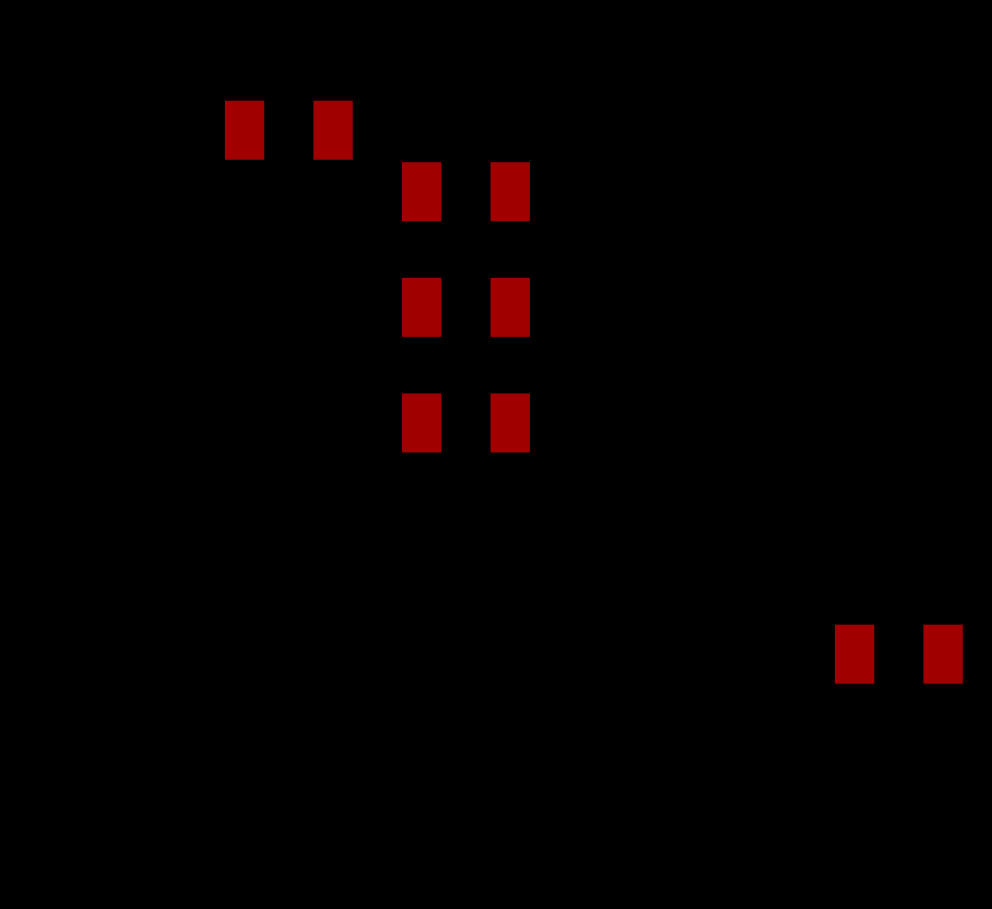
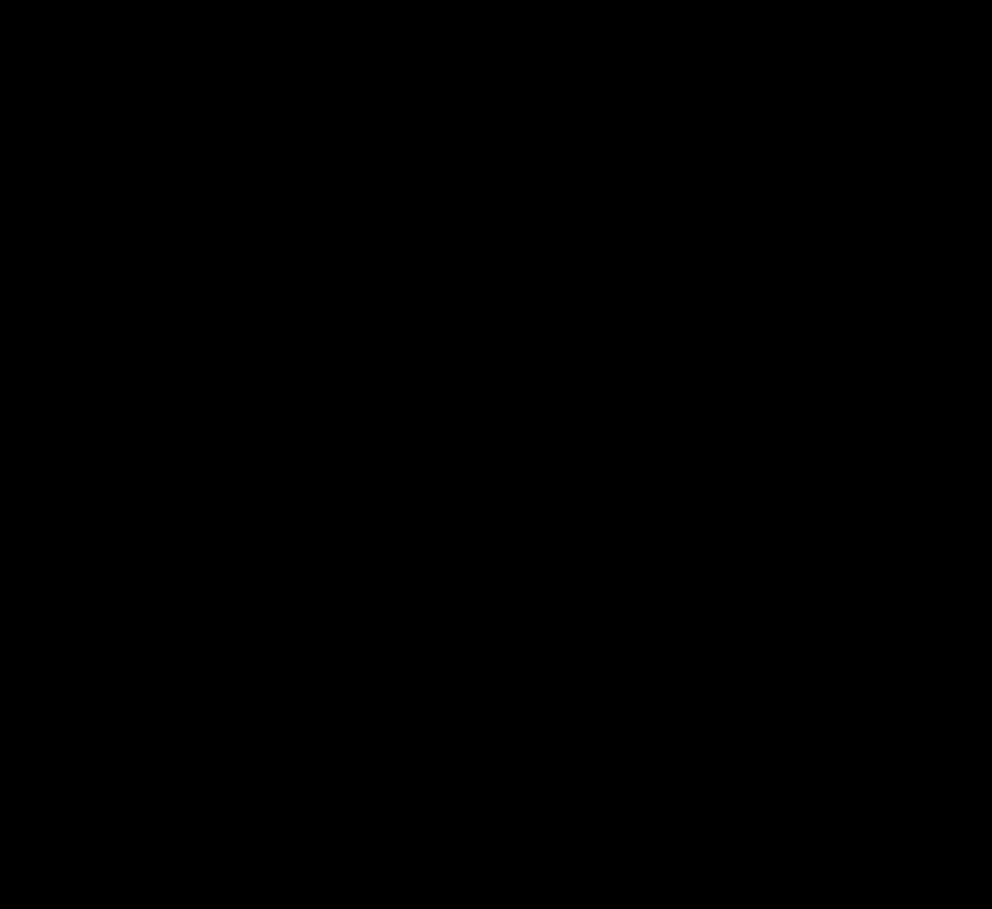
part: (288, 130) -> none
part: (465, 191) -> none
part: (465, 307) -> none
part: (465, 422) -> none
part: (898, 654) -> none

